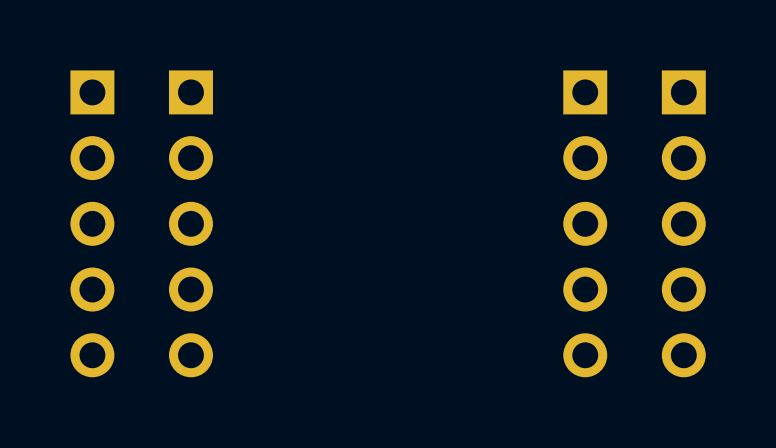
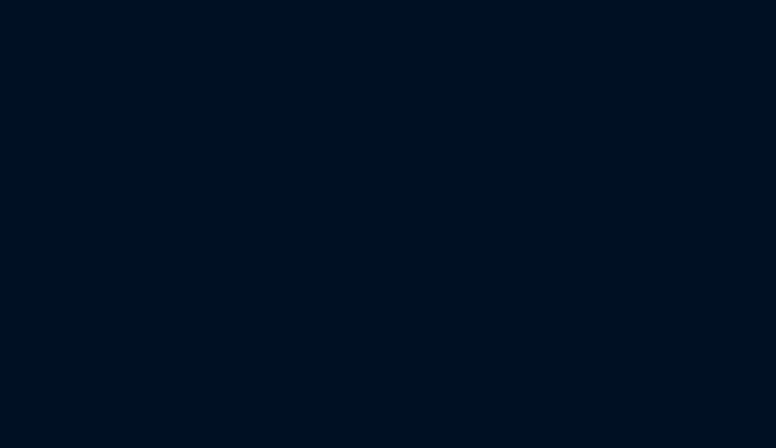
part: (92, 223) -> none
part: (190, 223) -> none
part: (585, 223) -> none
part: (683, 223) -> none

